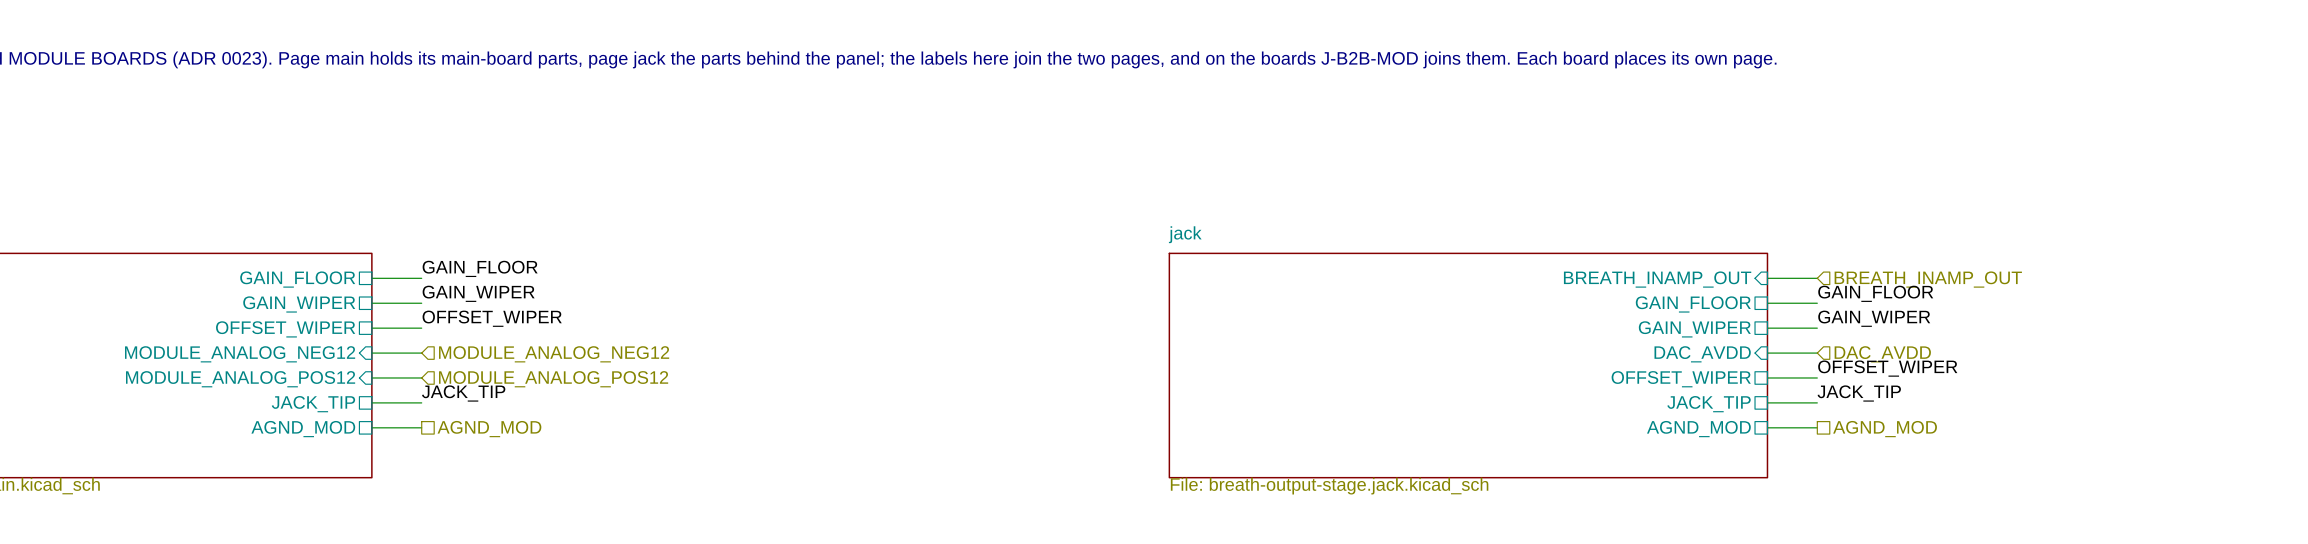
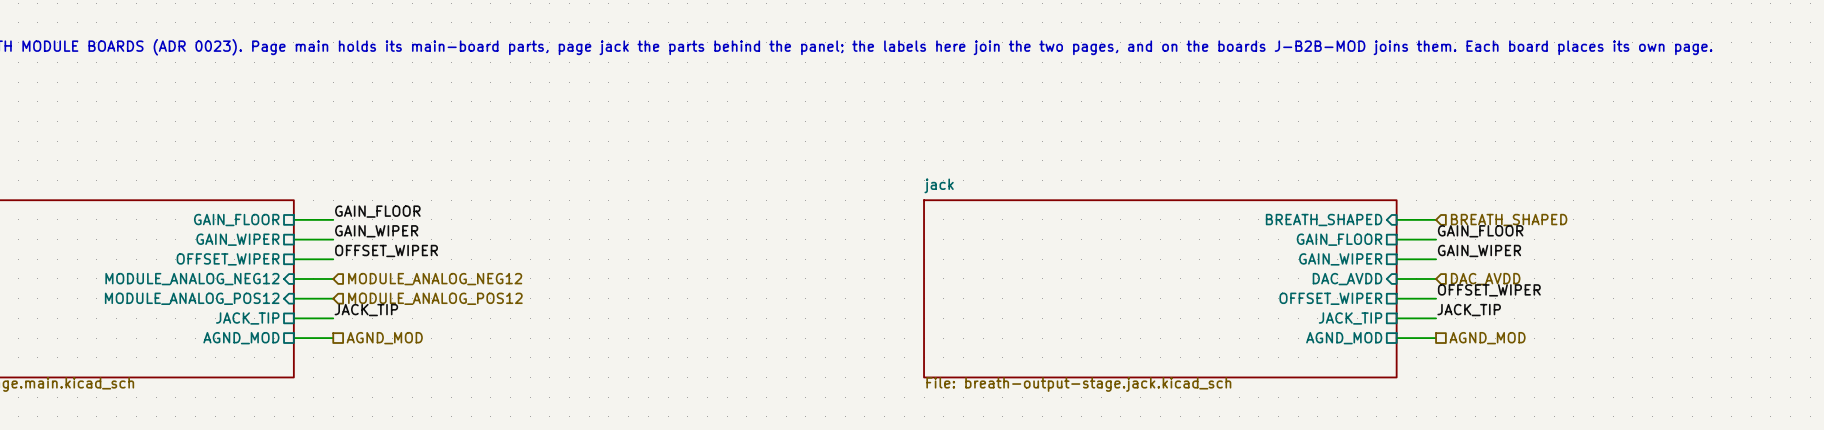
sheet pin: BREATH_INAMP_OUT (1657, 279) -> BREATH_SHAPED (1324, 220)
hierarchical label: BREATH_INAMP_OUT (1928, 279) -> BREATH_SHAPED (1509, 220)

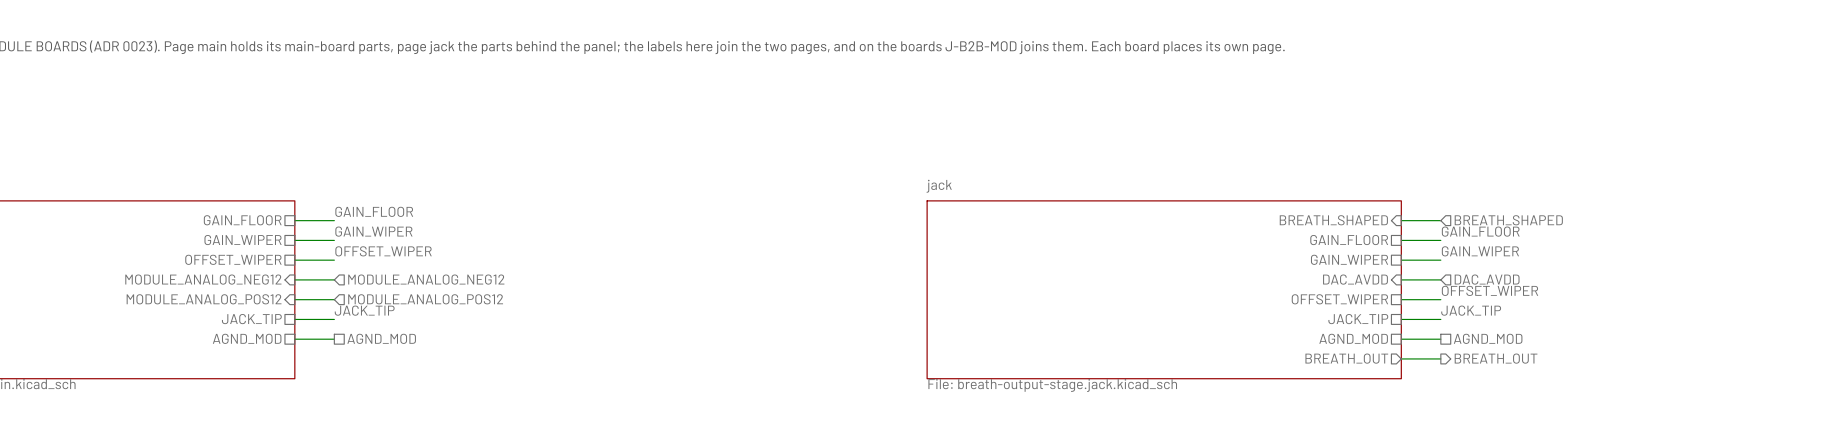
sheet pin: none -> BREATH_OUT (1346, 358)
wire: none -> (1401, 358) (1440, 358)
hierarchical label: none -> BREATH_OUT (1496, 358)

